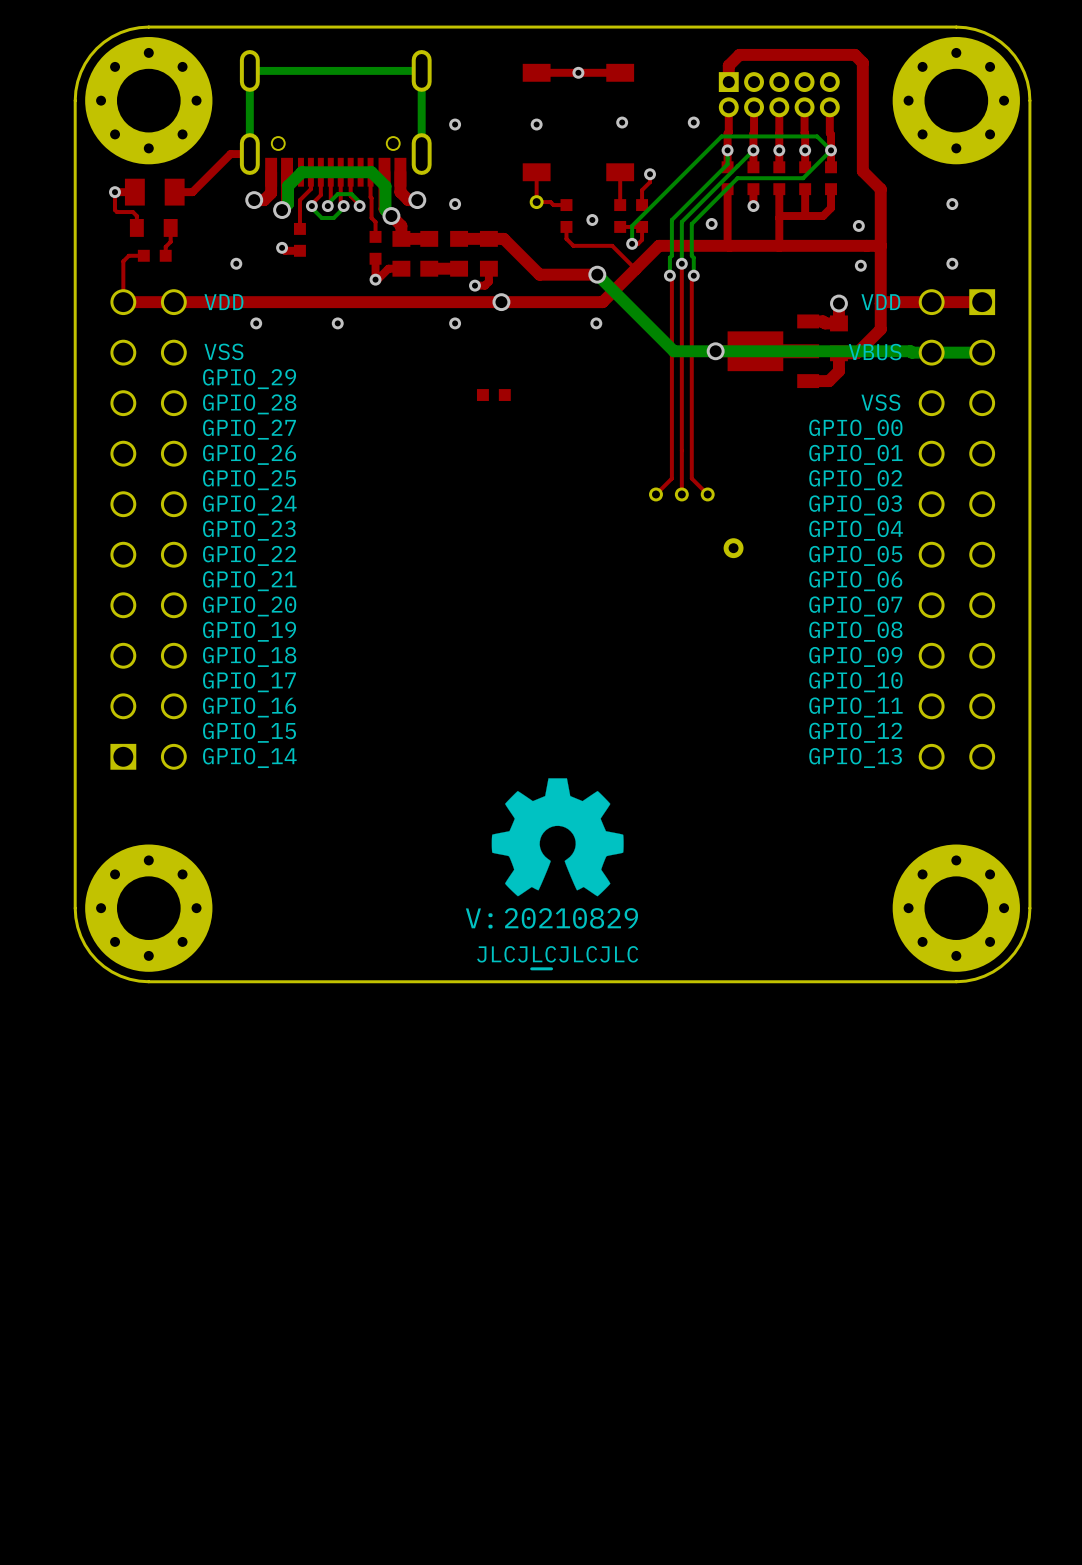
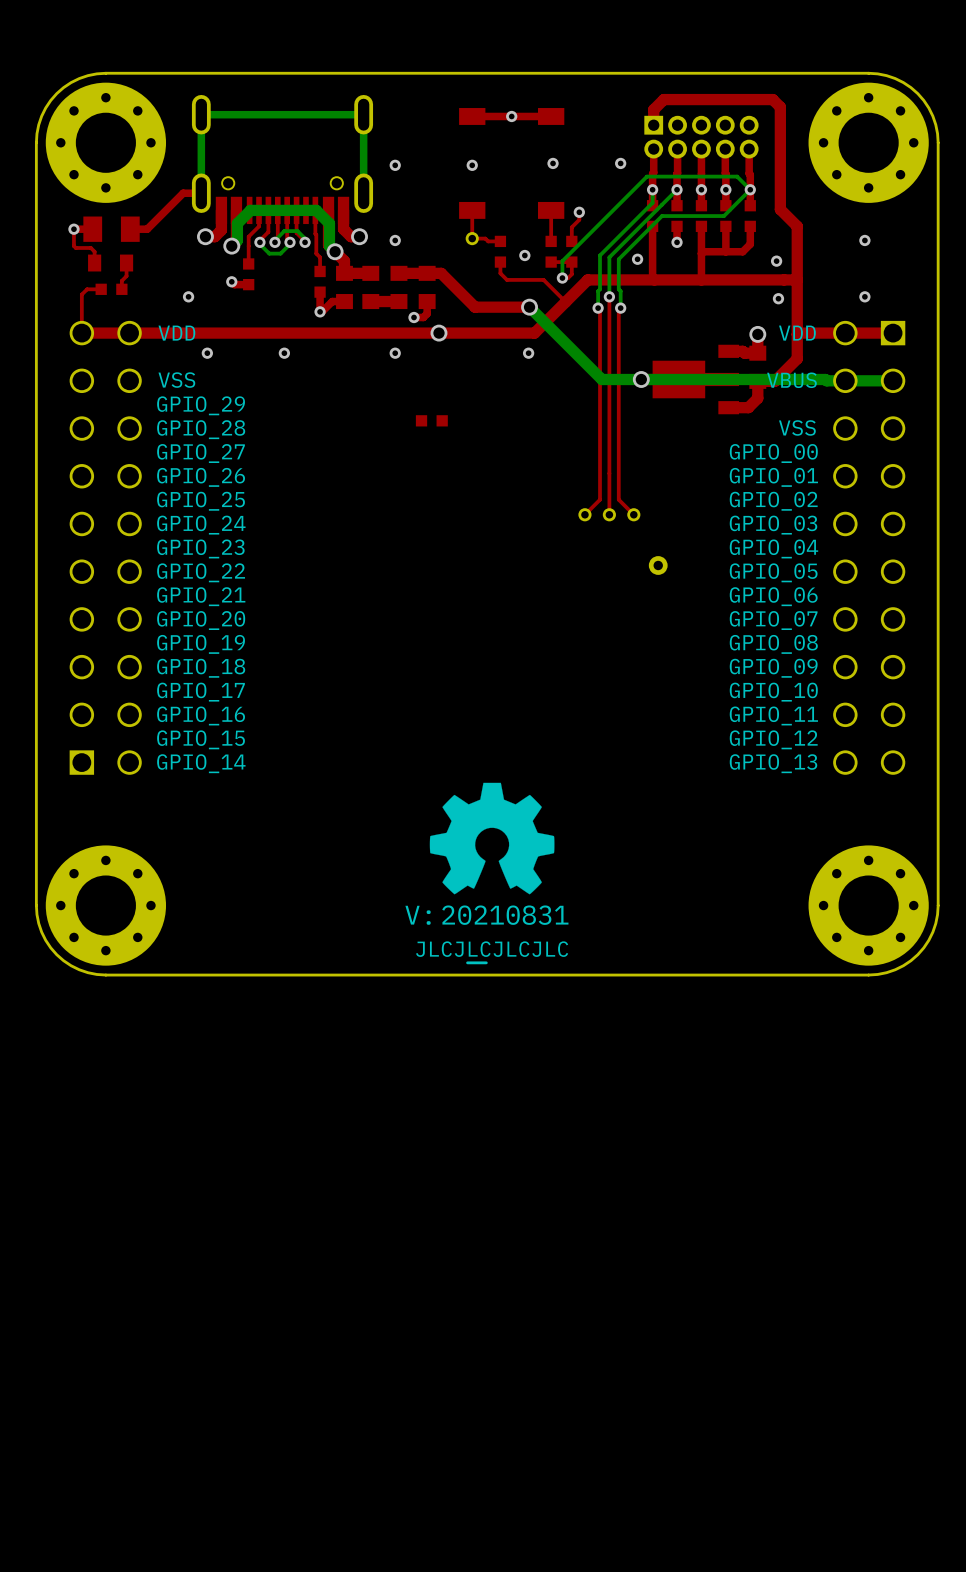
drawing shape: [465, 908, 639, 929] -> [405, 905, 569, 925]

